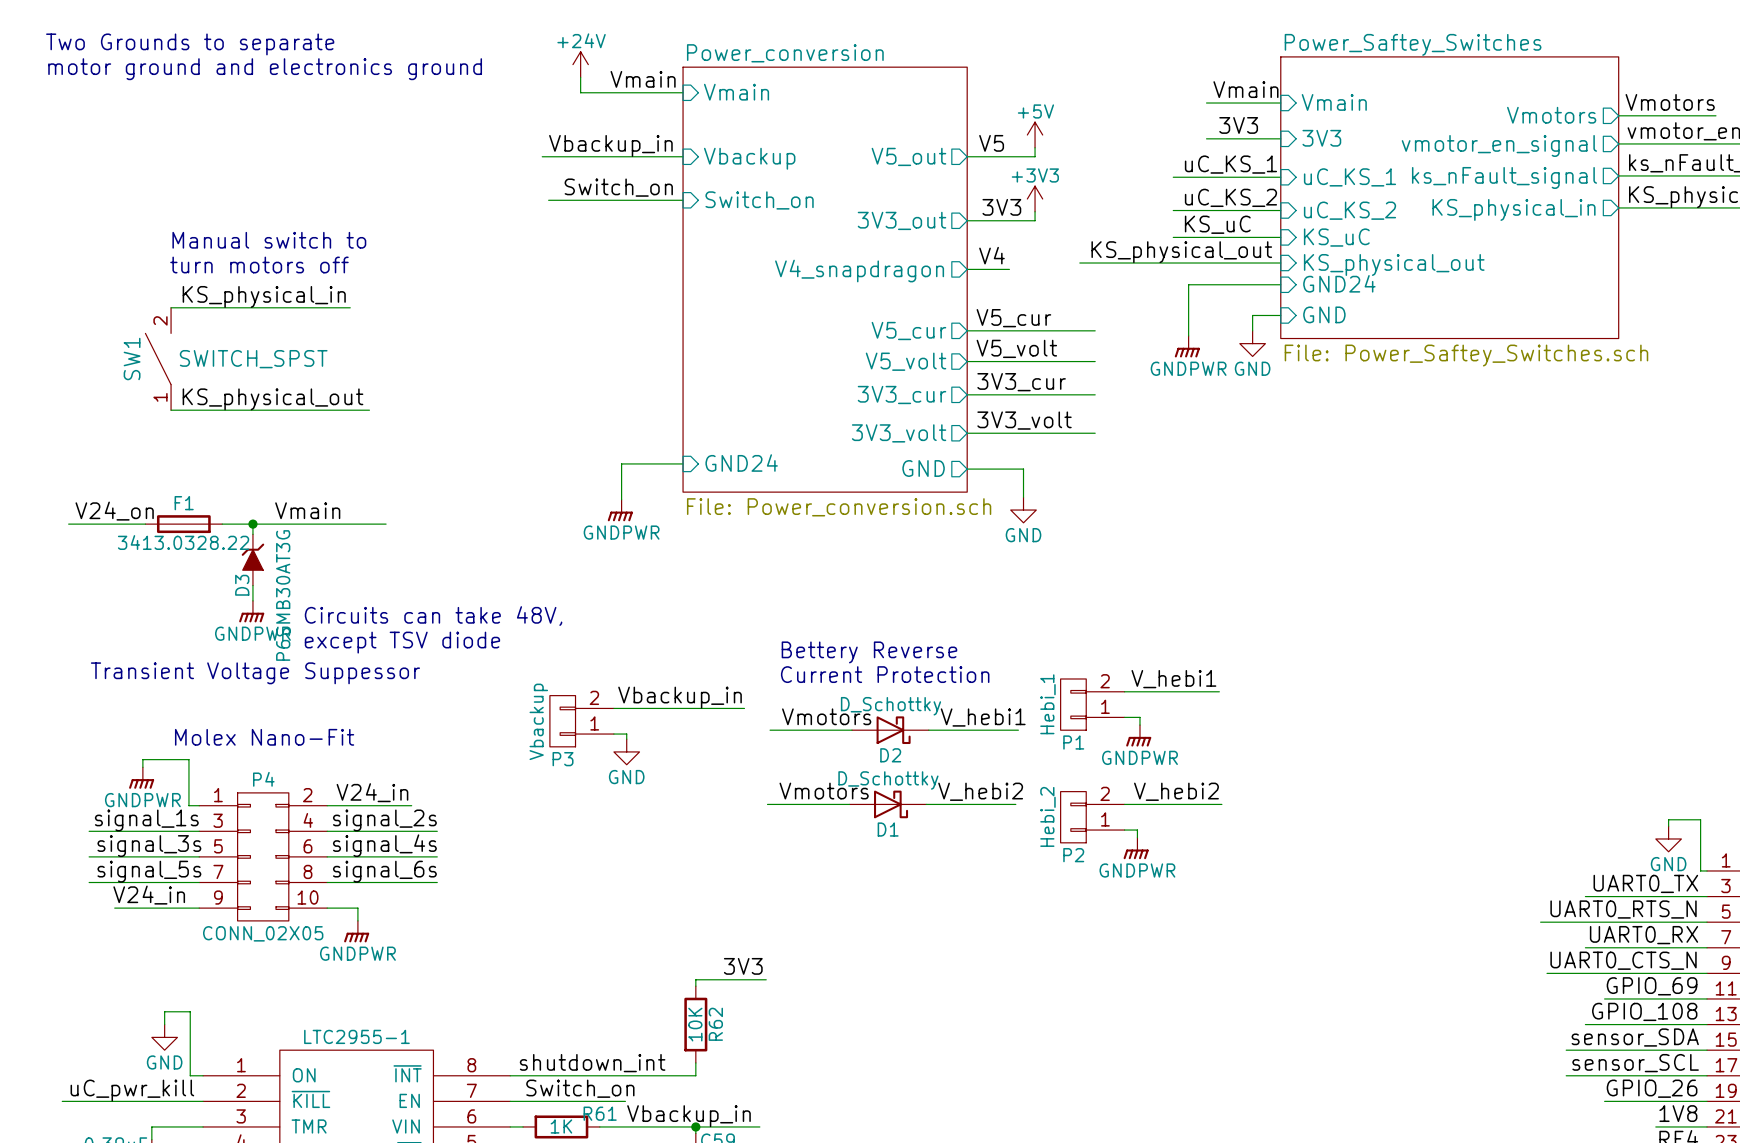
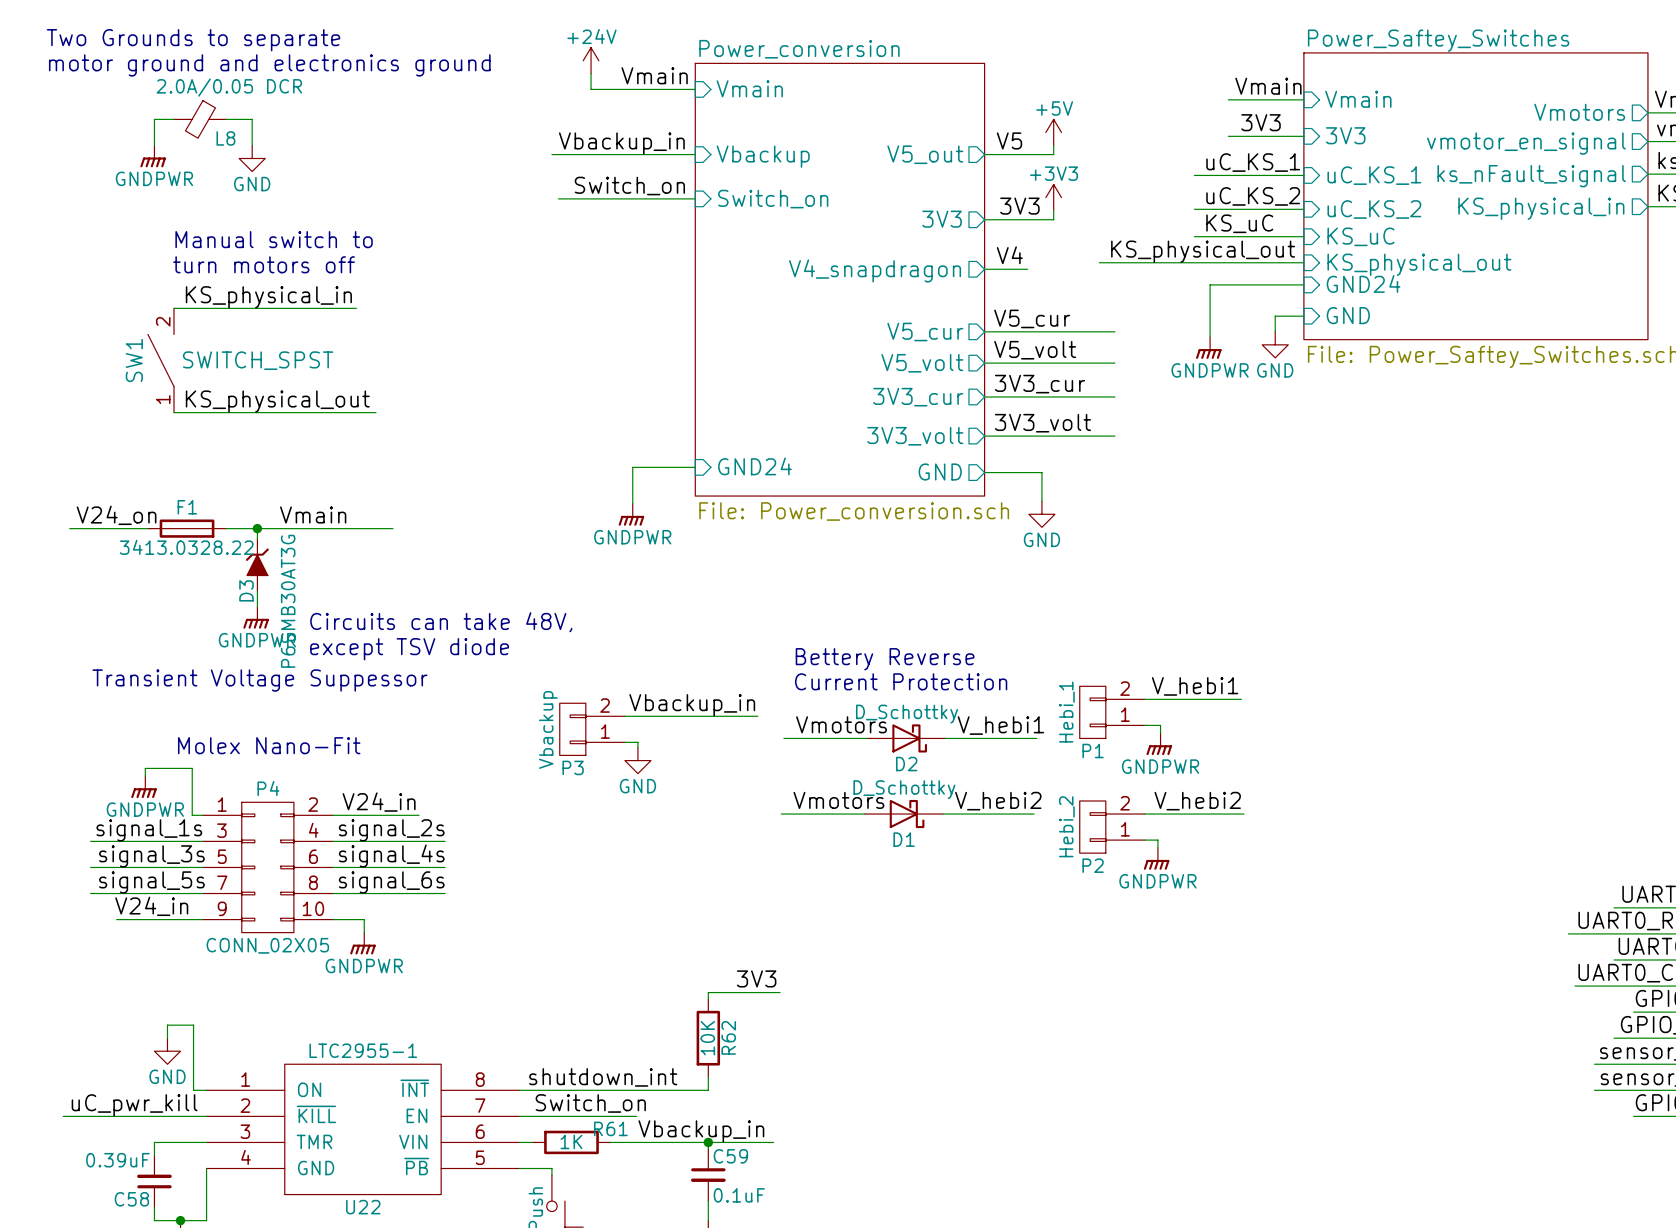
wire: none -> (173, 119) (154, 119) (154, 145)
L8: none -> 2.0A/0.05 DCR (200, 119)
wire: none -> (226, 119) (252, 119) (252, 145)
power symbol: none -> GNDPWR (153, 156)
power symbol: none -> GND (252, 158)
sheet pin: 3V3_out (902, 220) -> 3V3 (942, 219)

